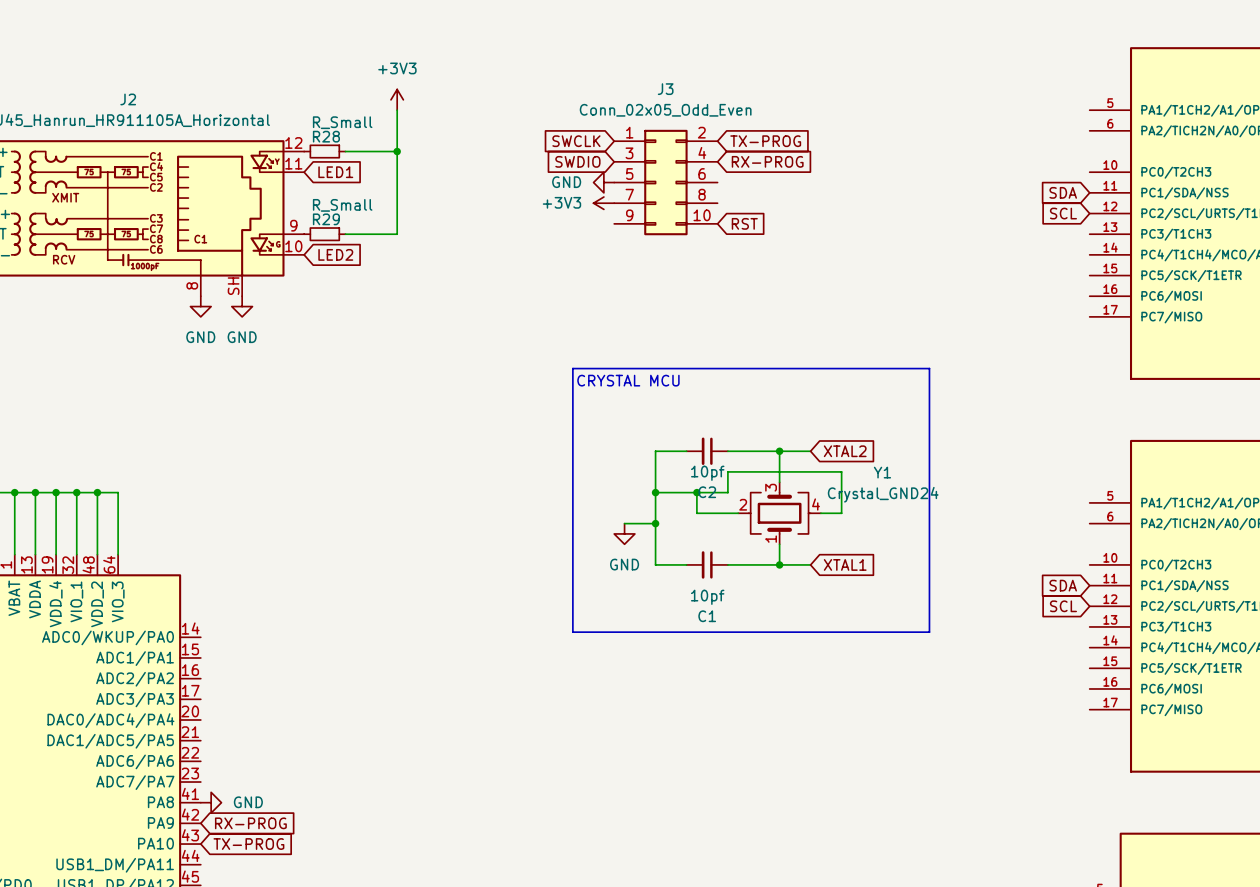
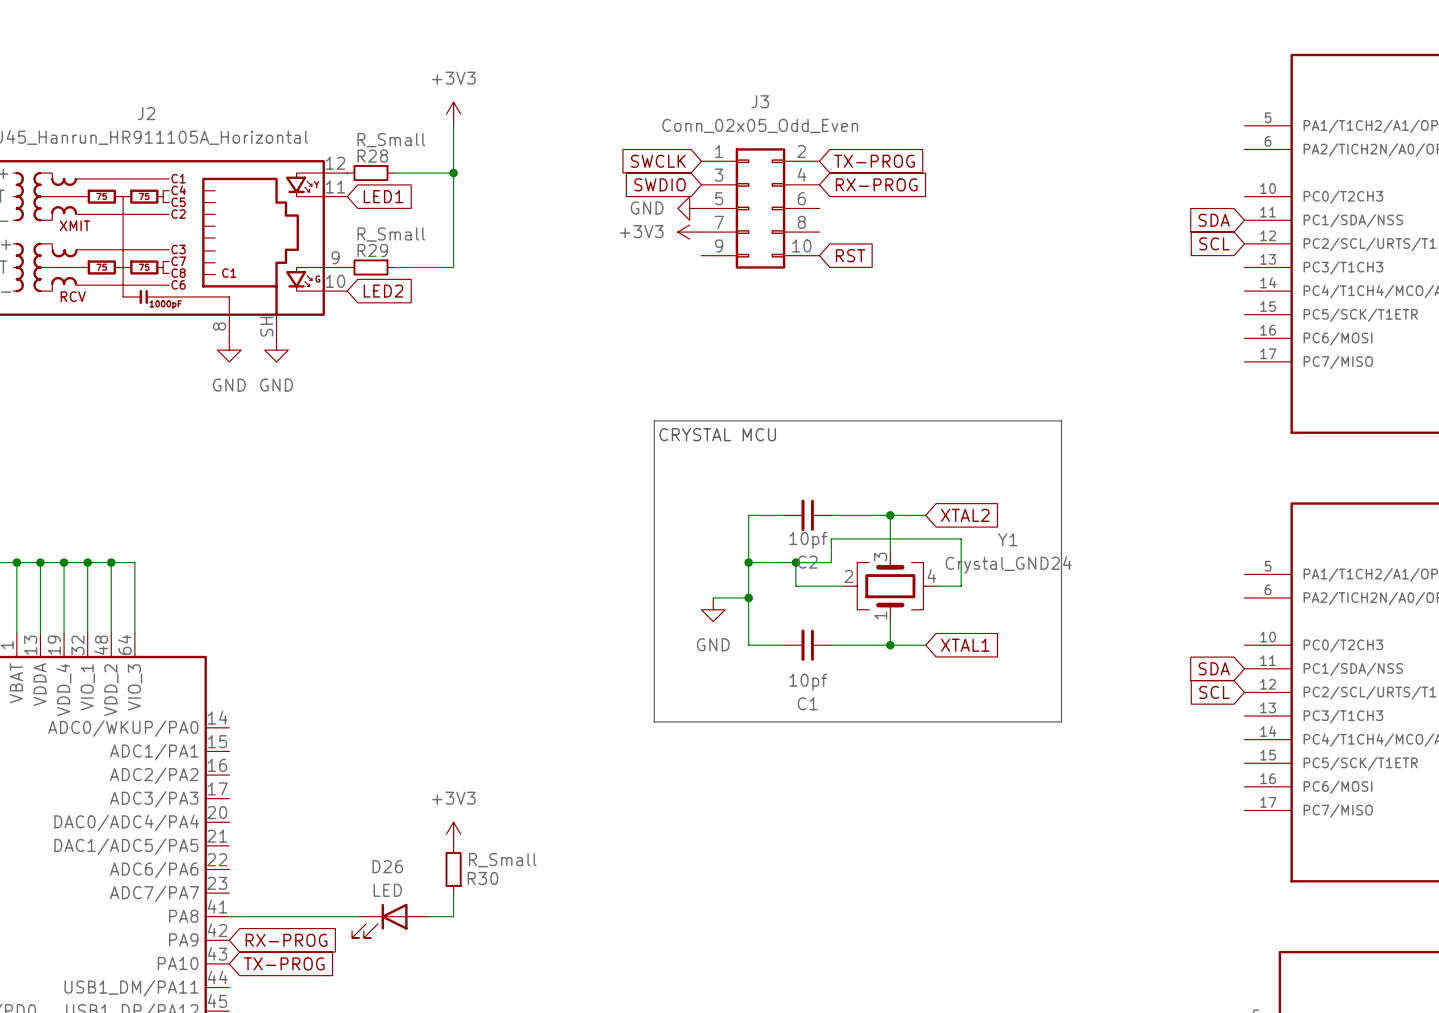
power symbol: none -> +3V3 (453, 834)
R30: none -> R_Small (453, 869)
wire: none -> (453, 893) (453, 916) (429, 916)
wire: none -> (229, 916) (359, 916)
power symbol: GND (211, 802) -> none
D26: none -> LED (391, 920)

